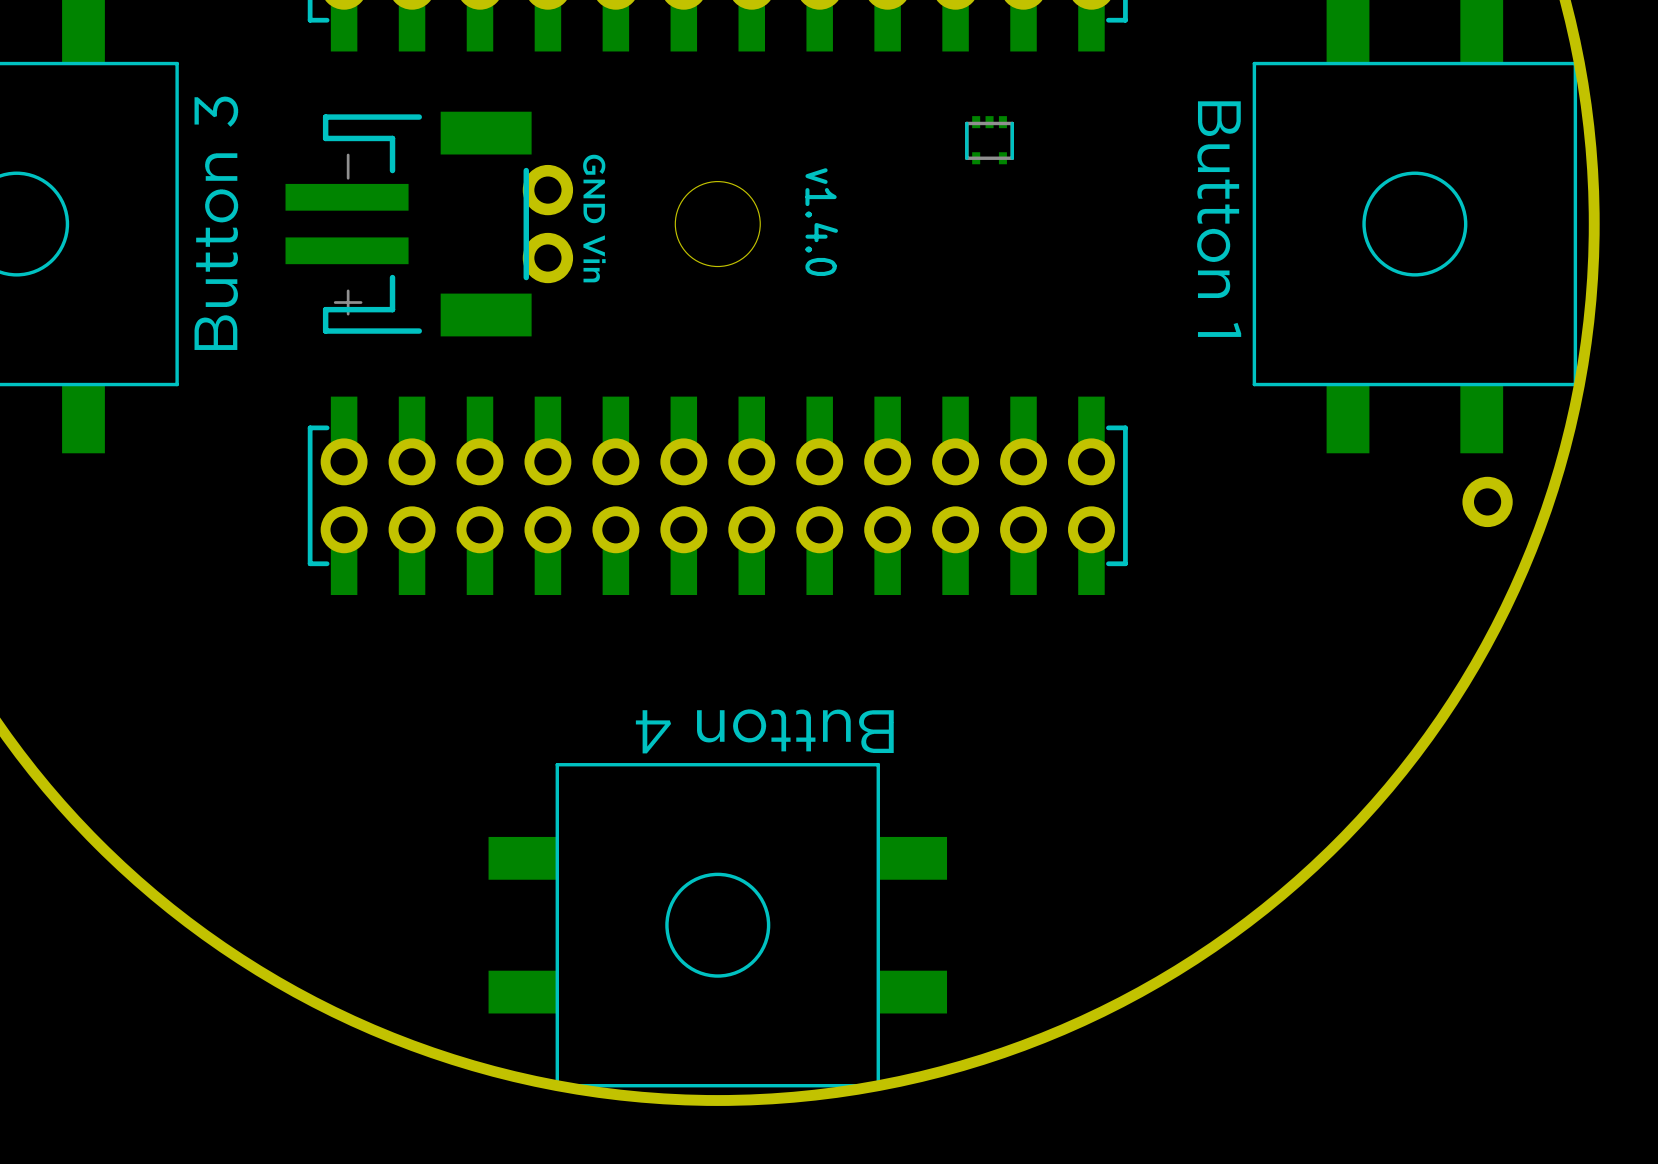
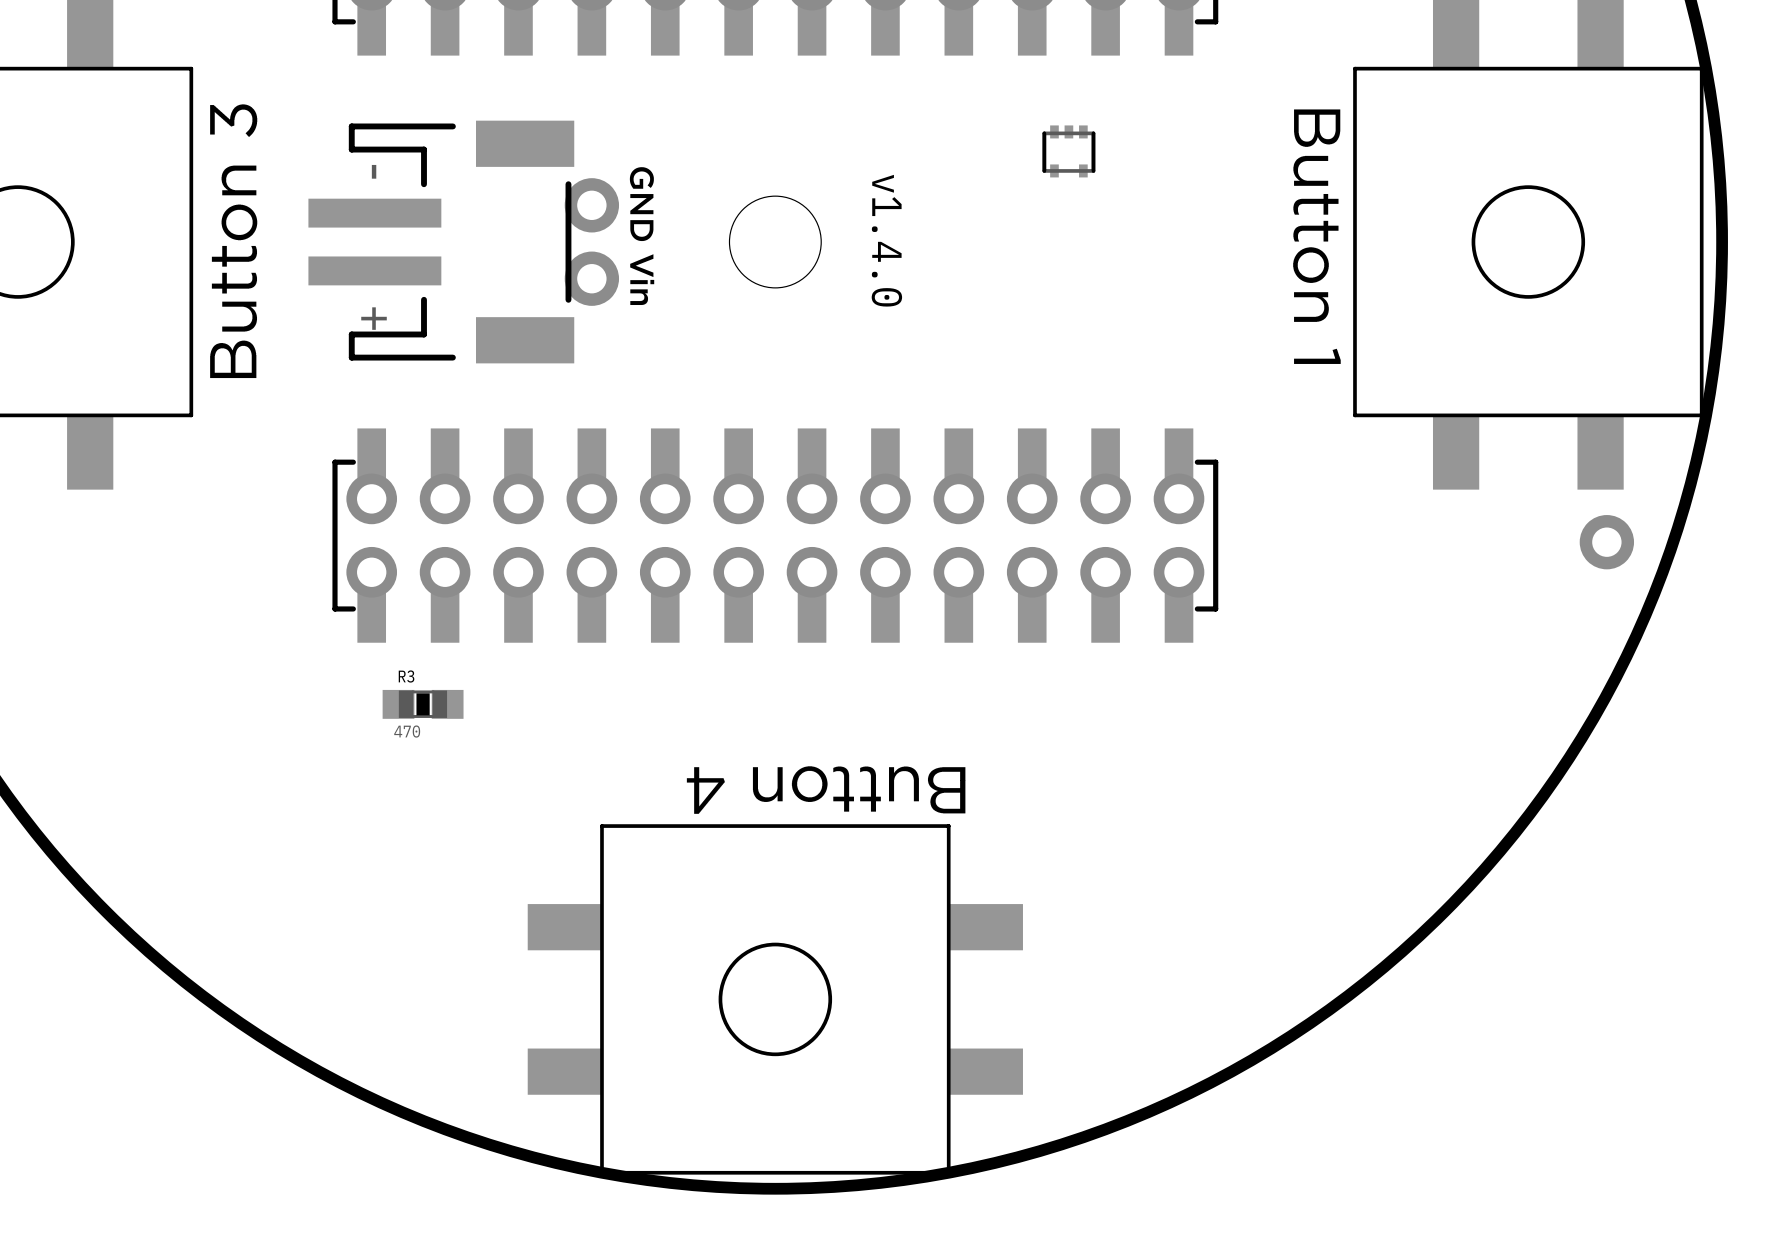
R3: none -> 470 (423, 704)

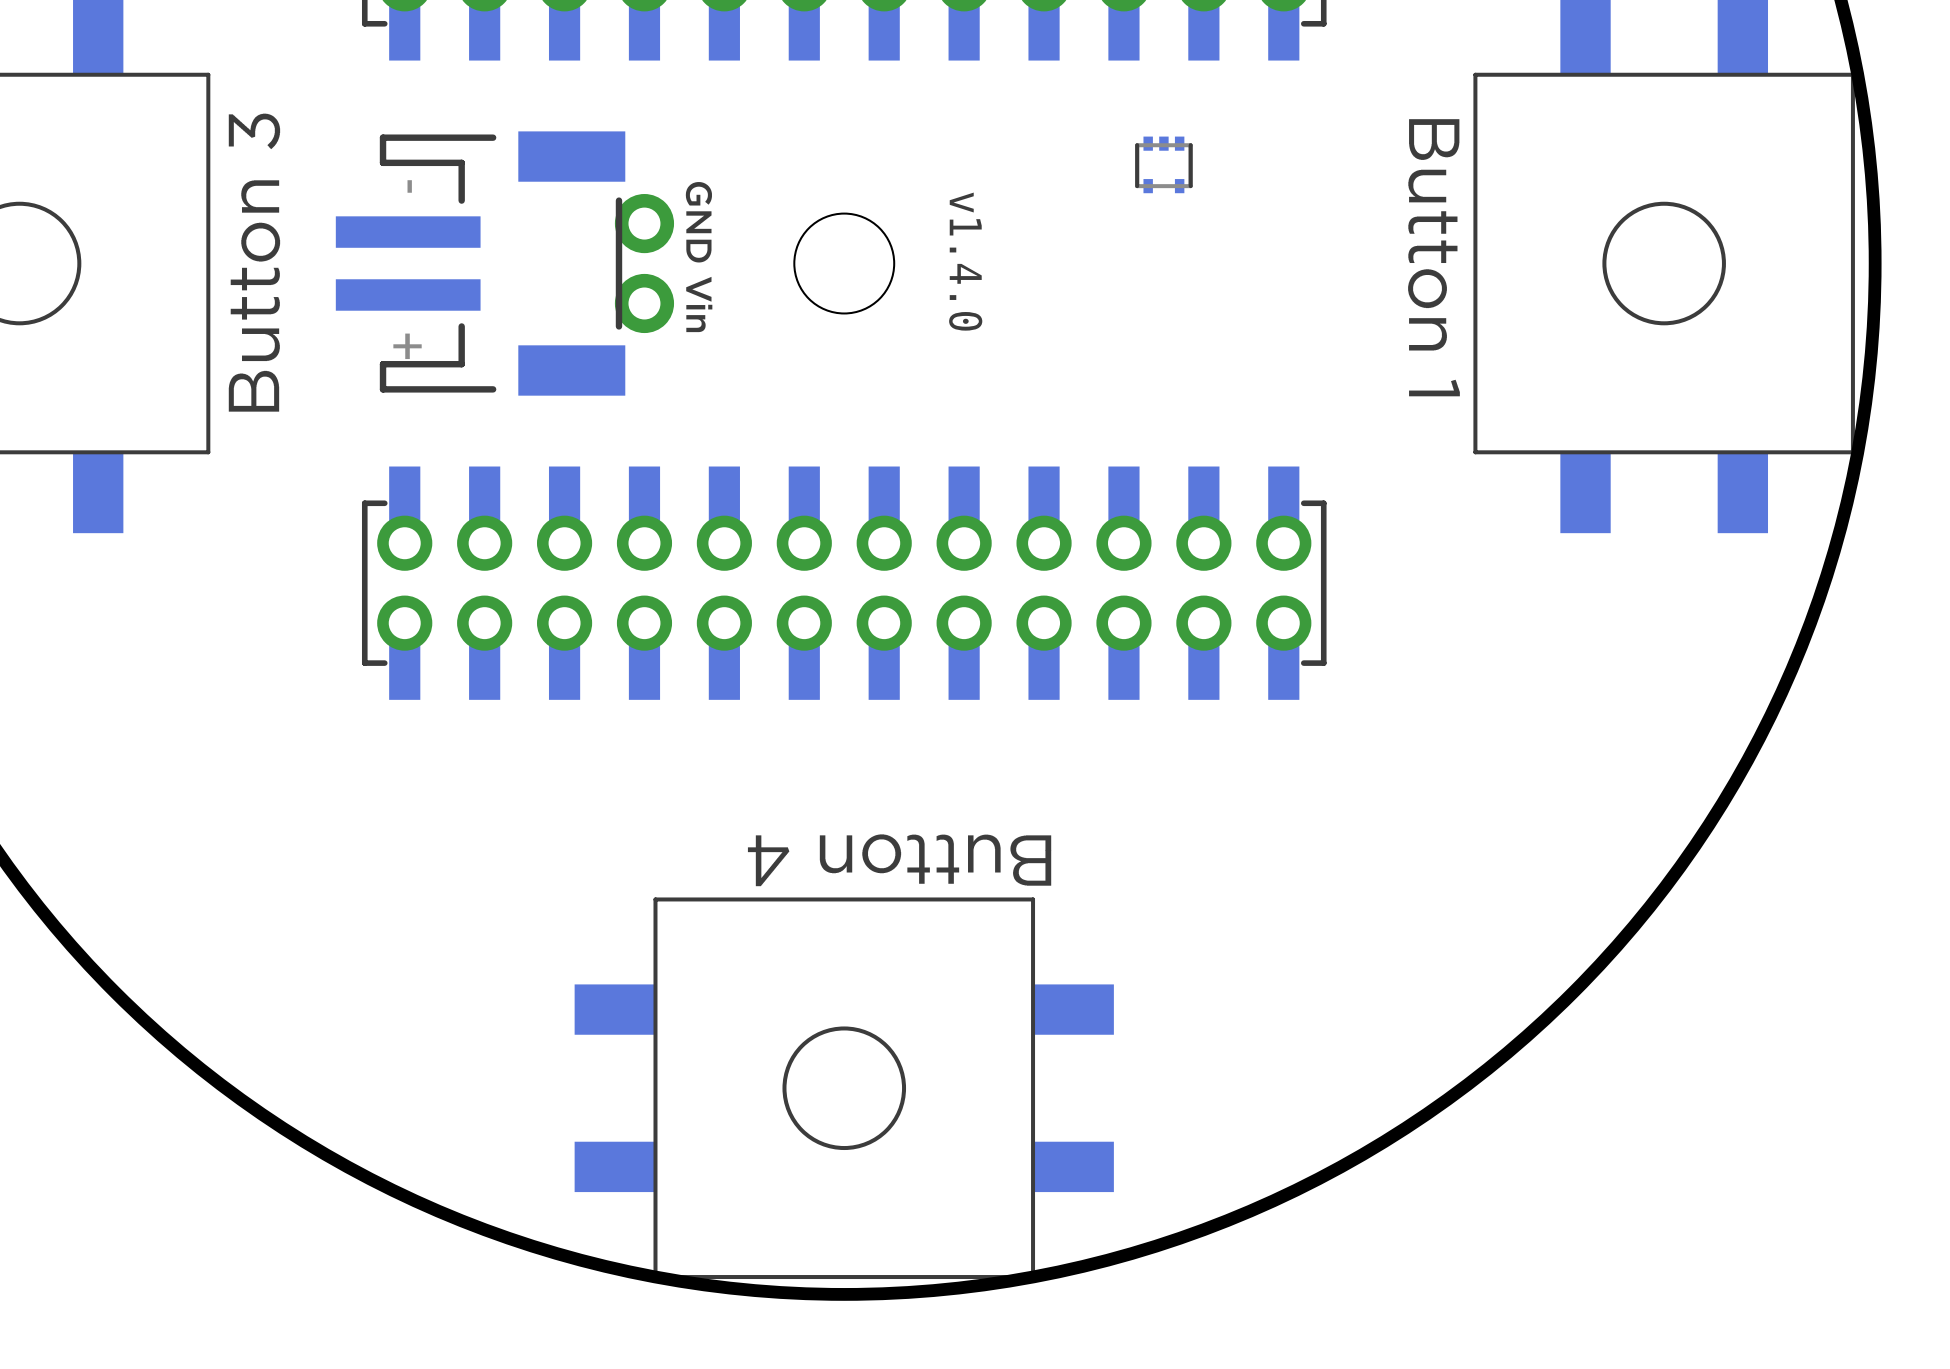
part: (1606, 542) -> none
R3: 470 (423, 704) -> none

